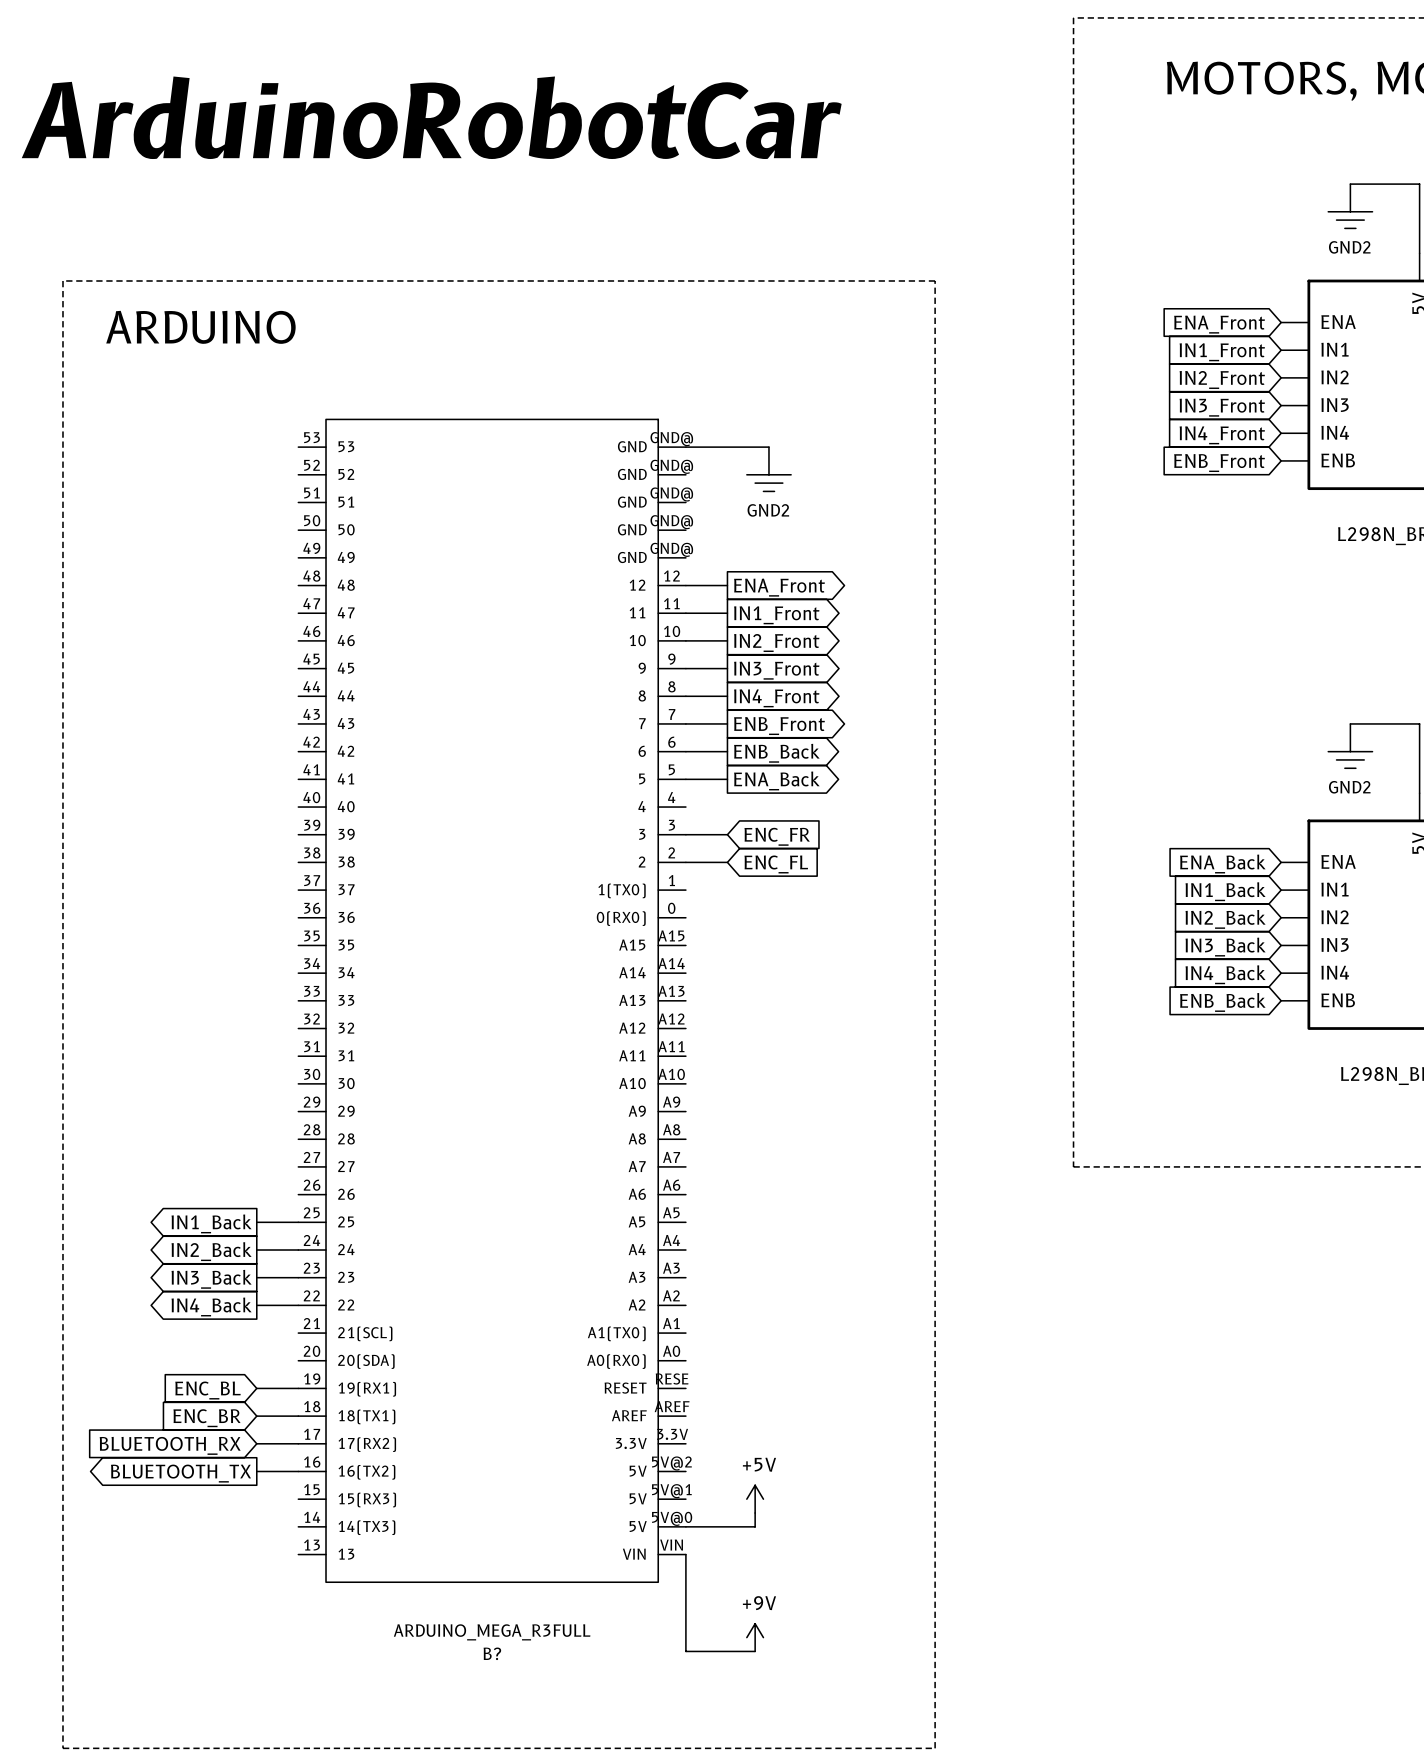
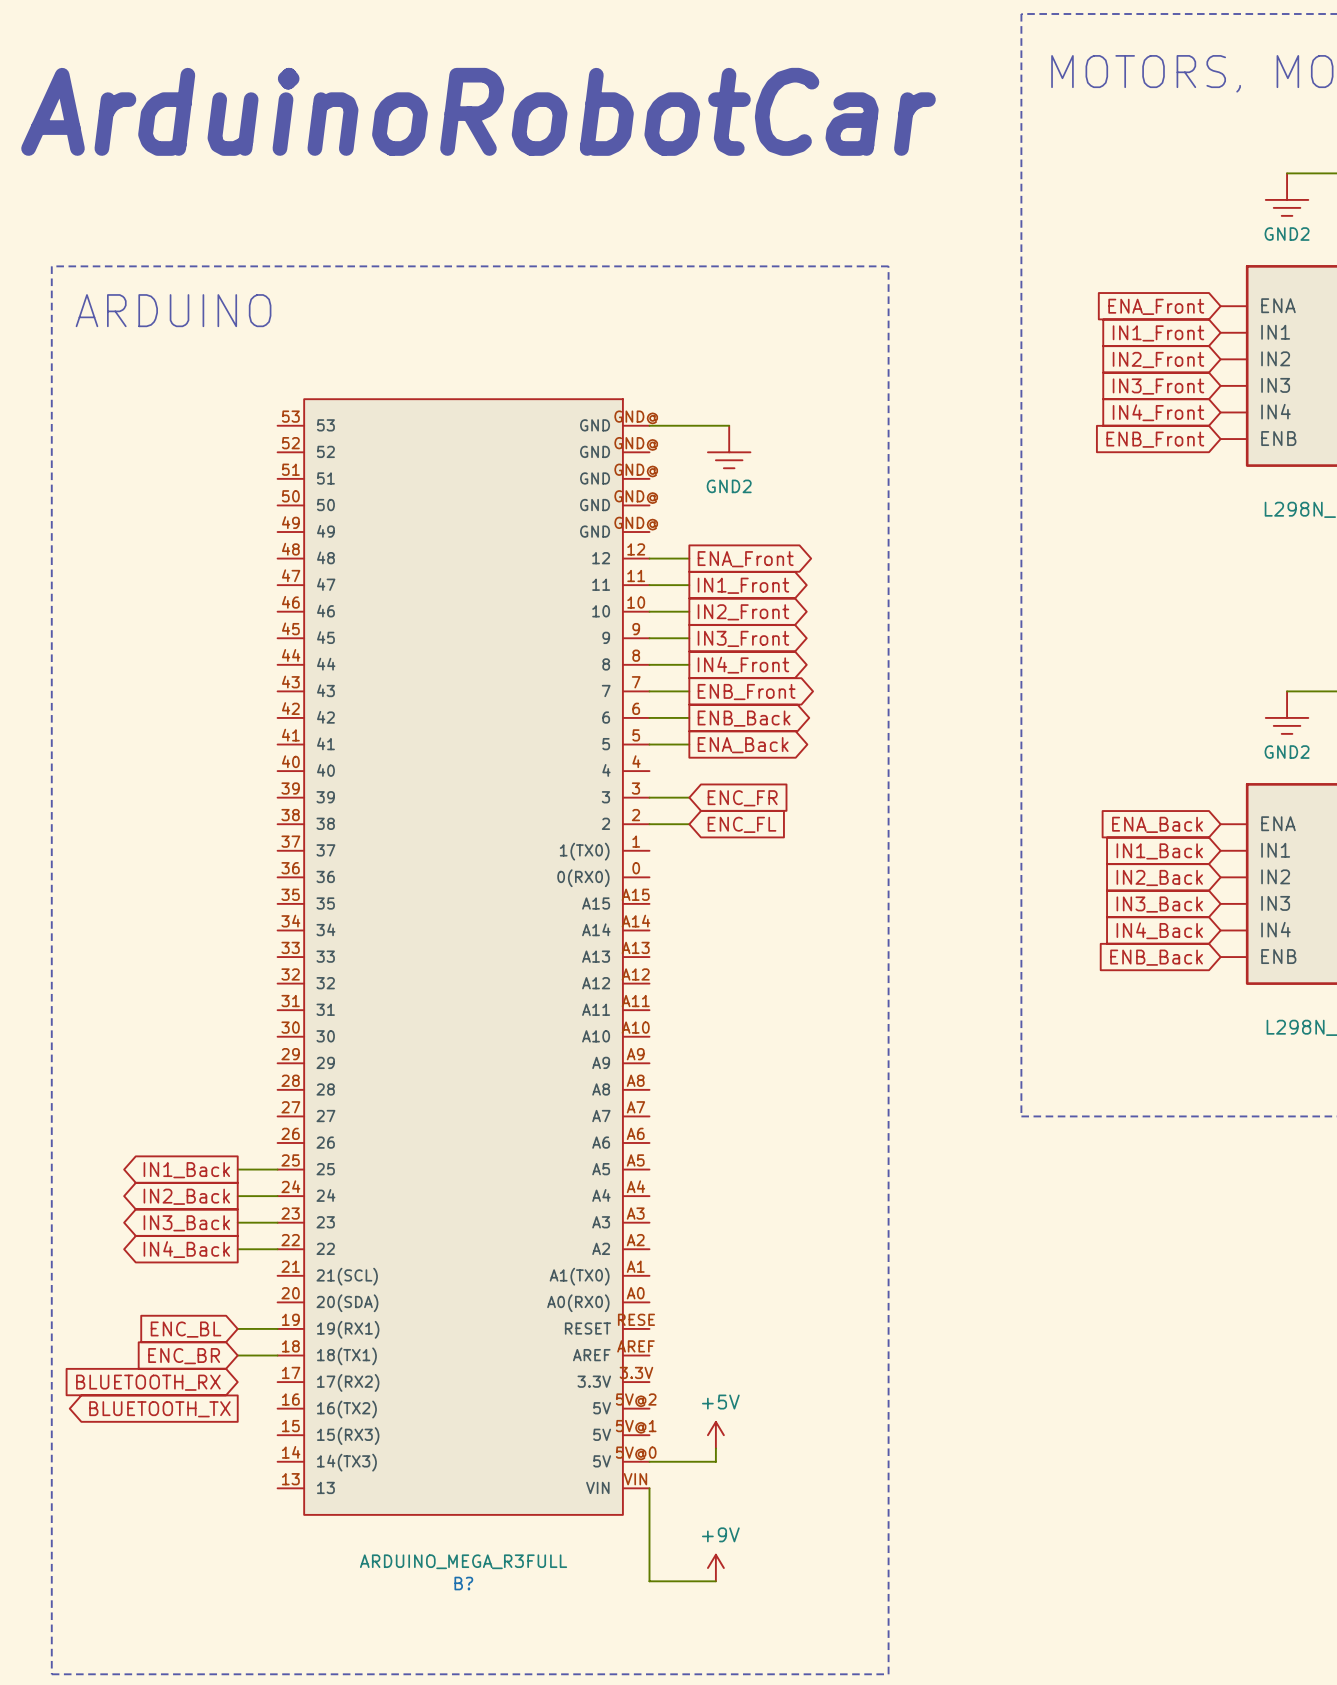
wire: (256, 1443) (298, 1443) -> none
wire: (256, 1471) (298, 1471) -> none

